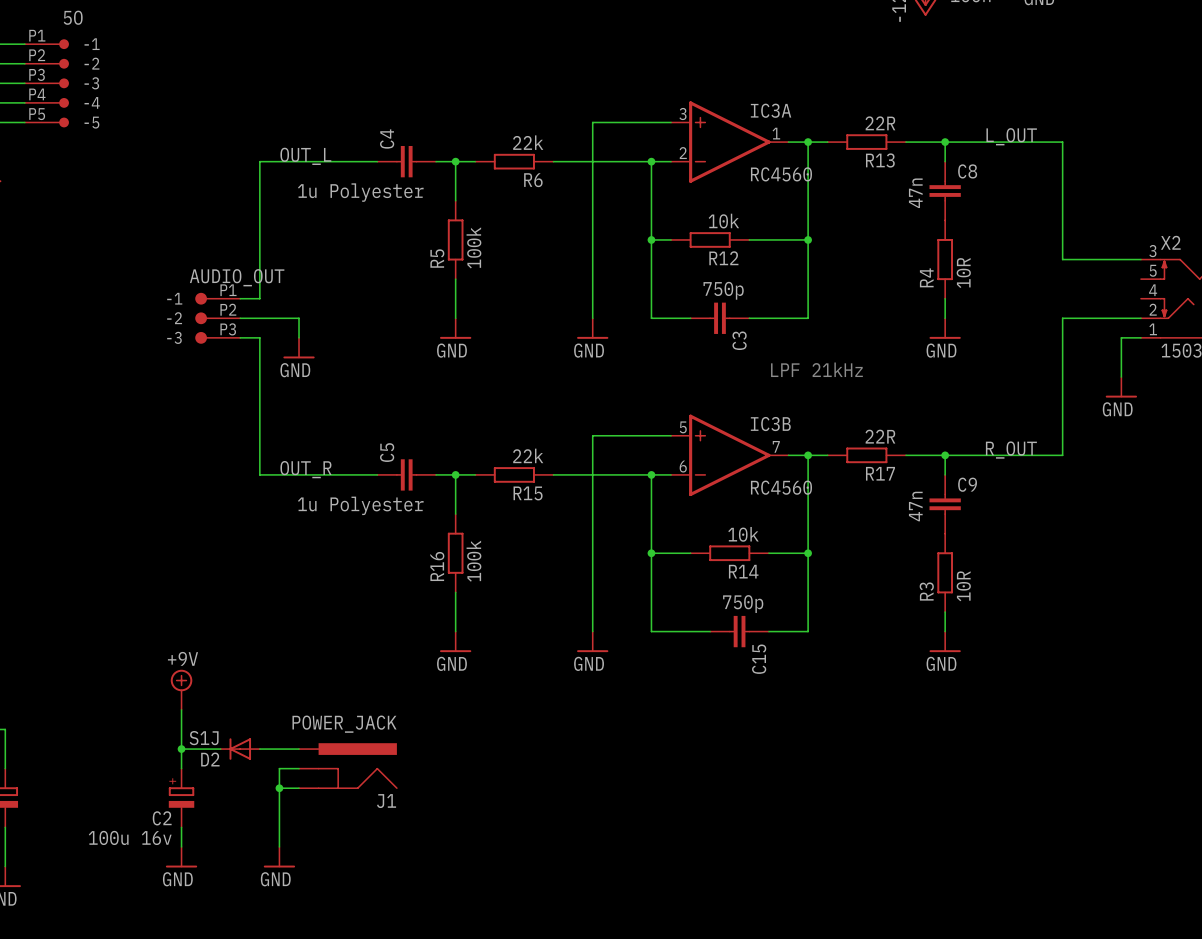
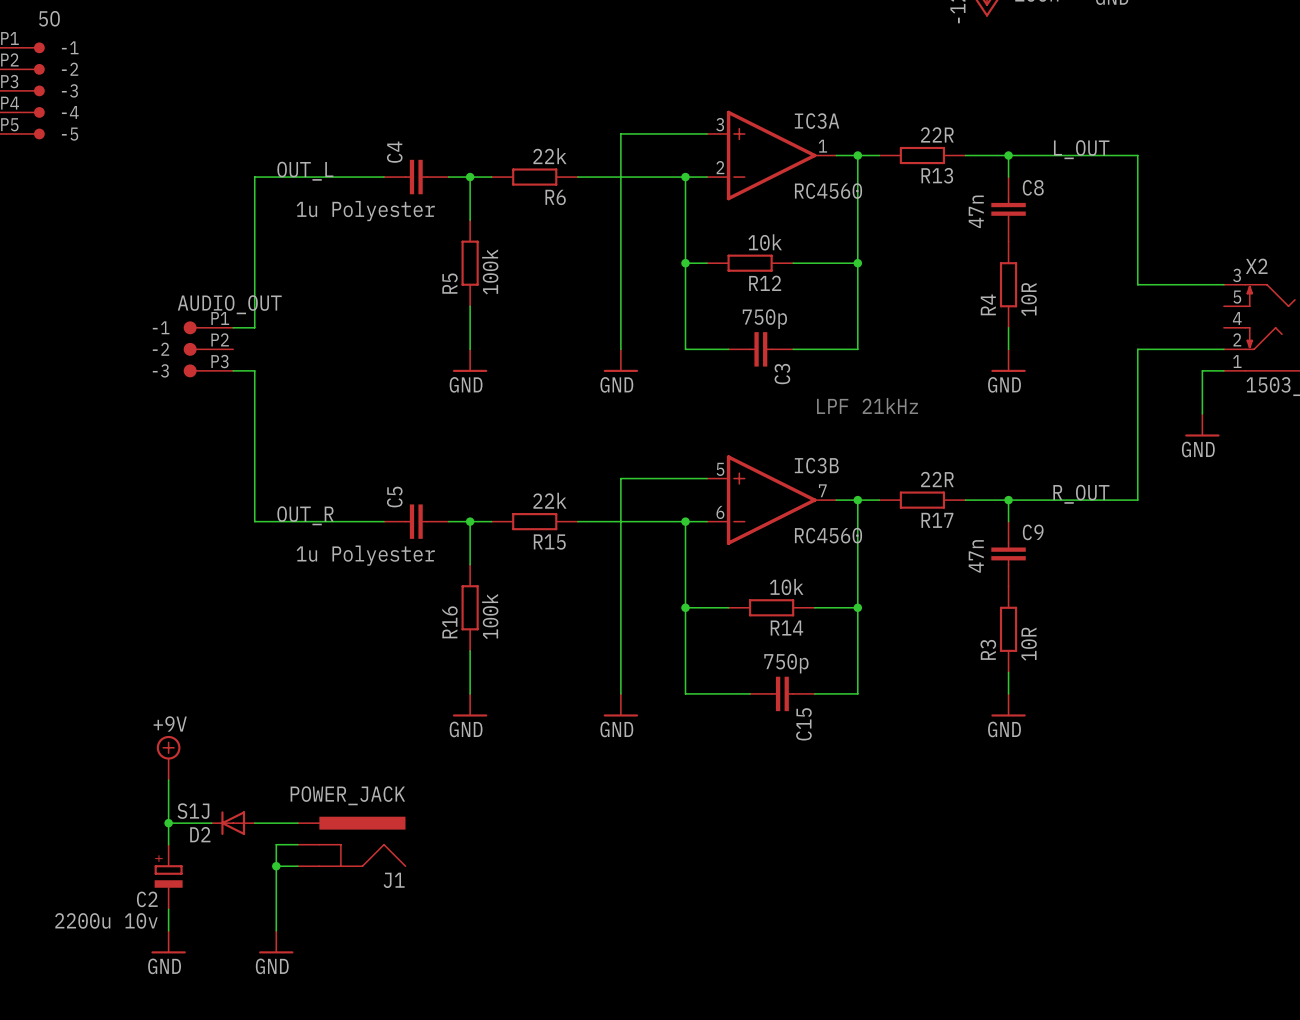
wire: (240, 318) (299, 318) (299, 337) -> none
power symbol: GND (299, 348) -> none
C2 value: 100u 16v (130, 837) -> 2200u 10v (106, 920)

